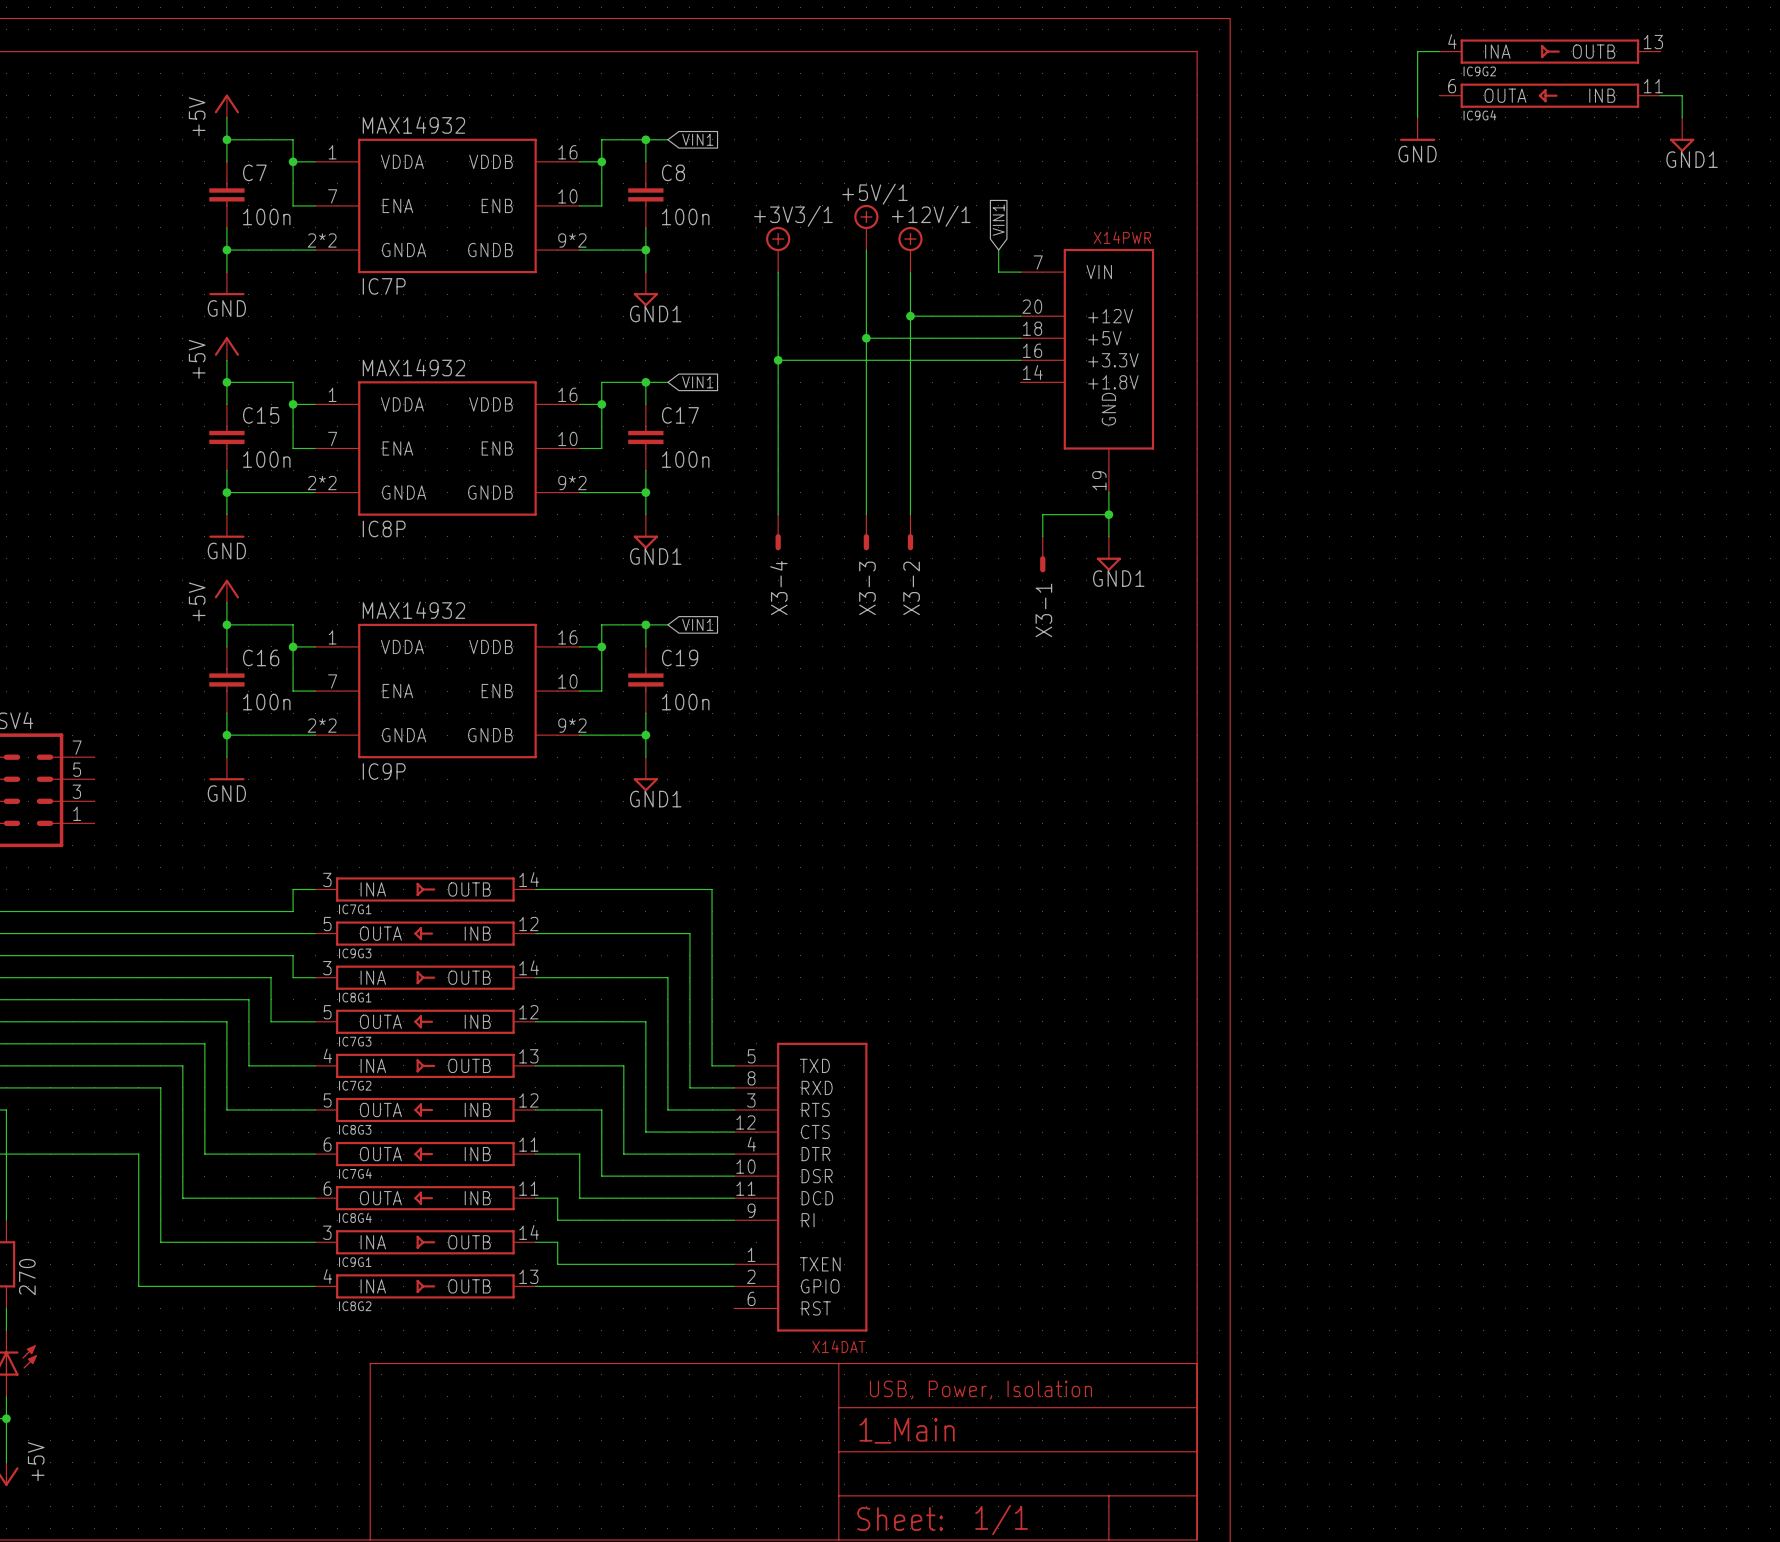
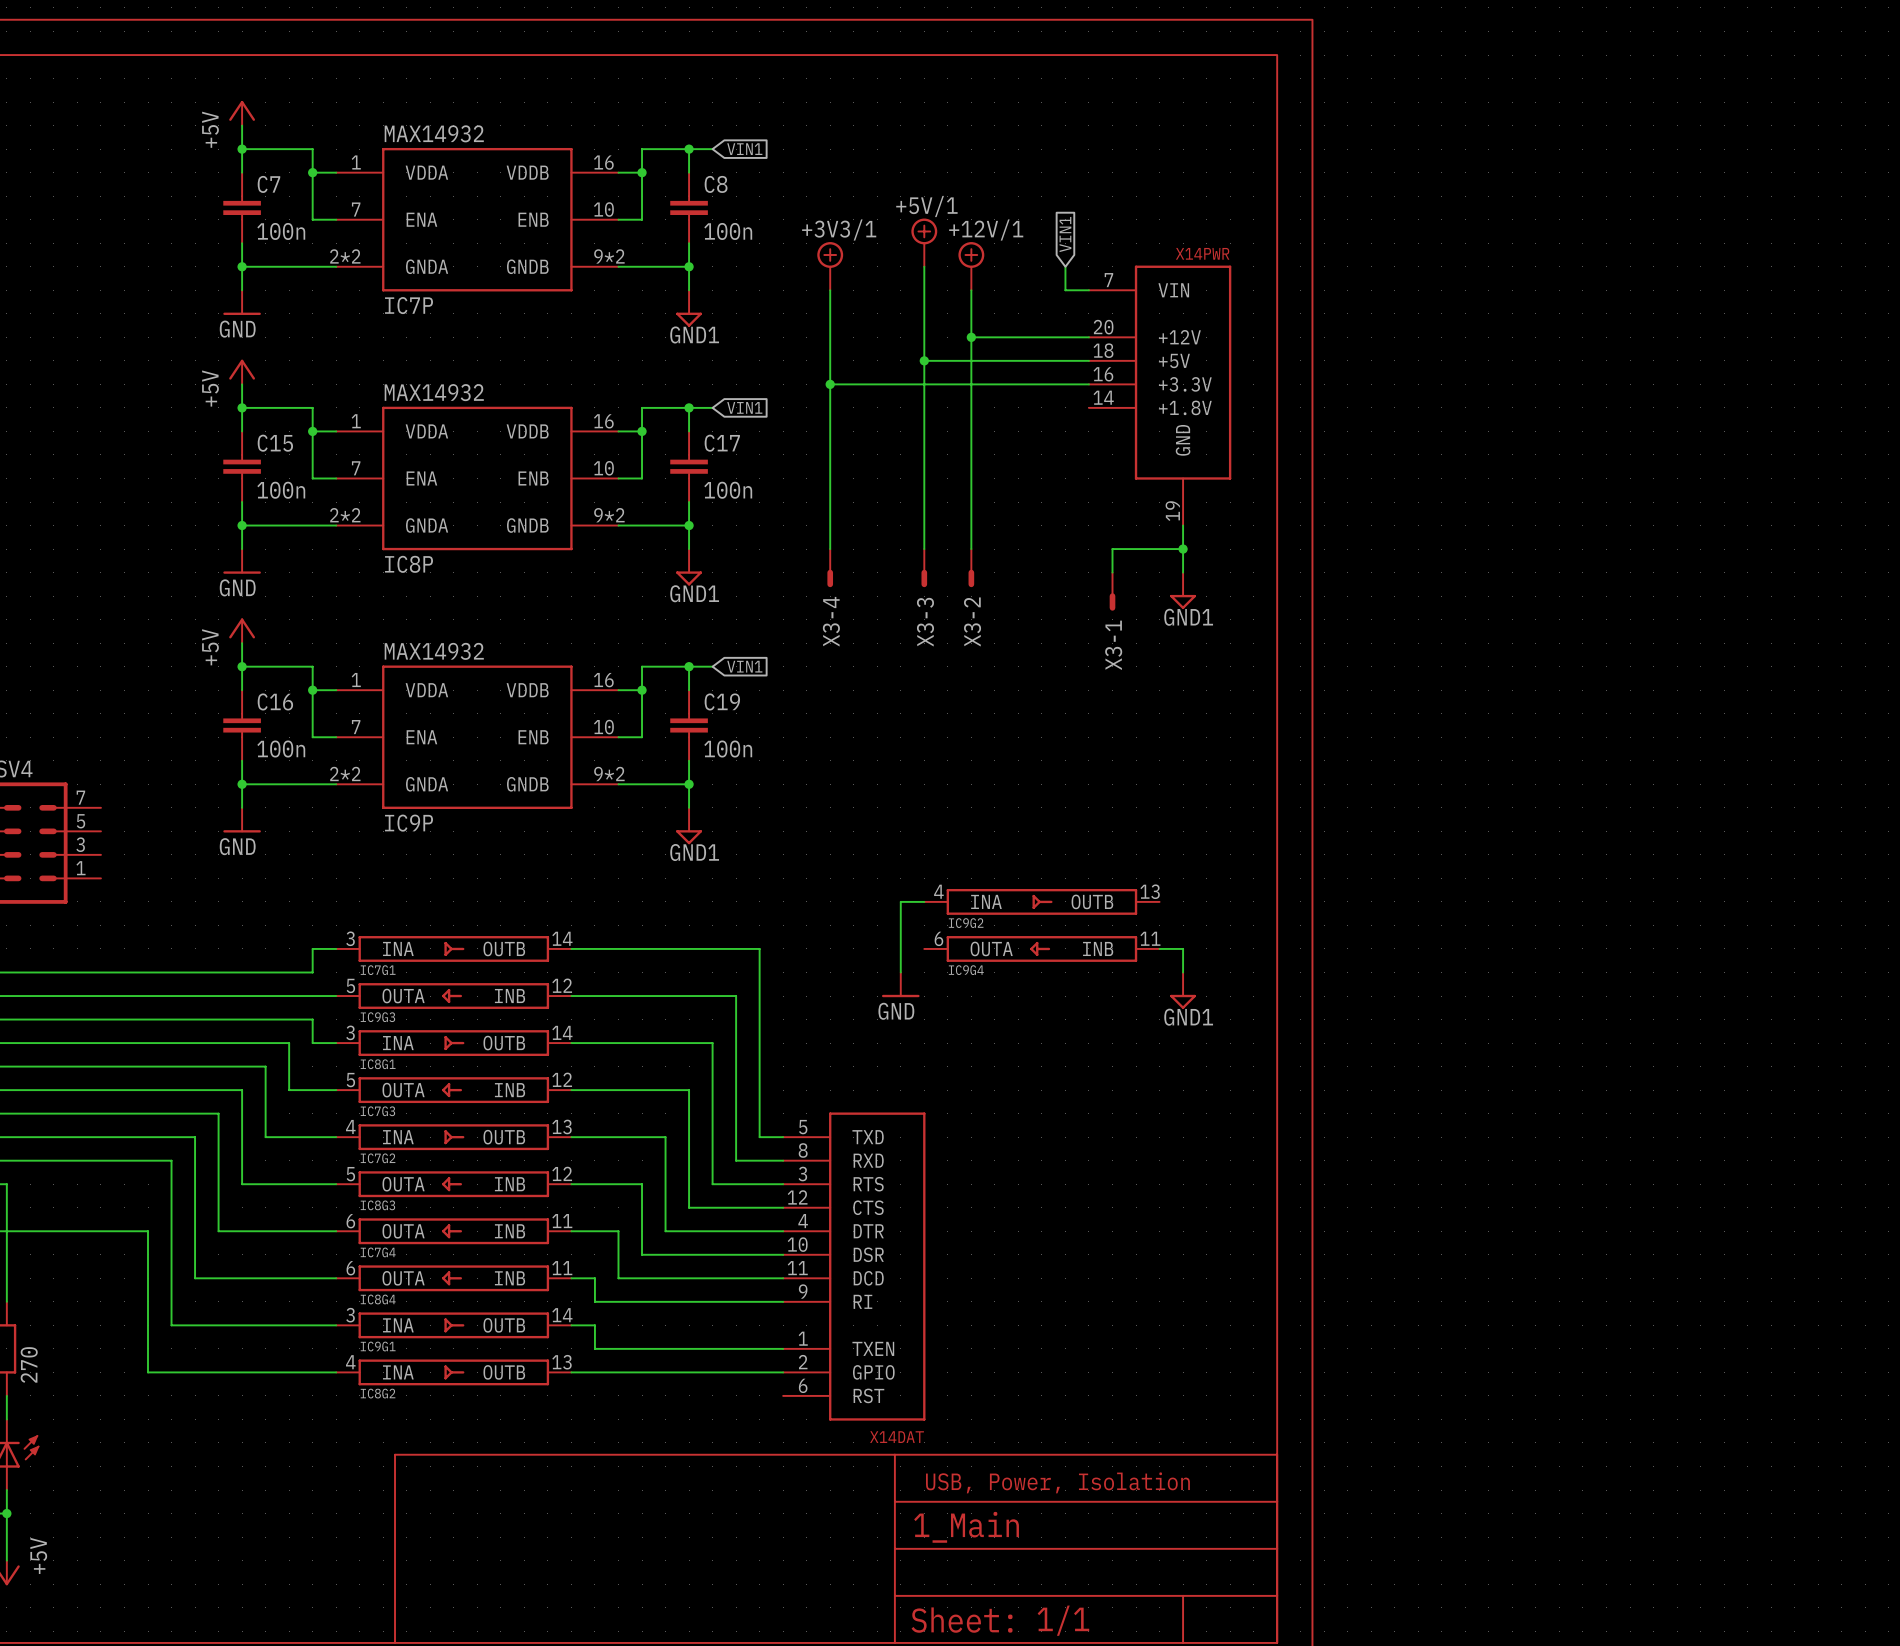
wire: (1439, 51) (1417, 51) (1417, 117) -> none
IC9G2 position: (1549, 51) -> (1041, 901)
IC9G4 position: (1549, 95) -> (1041, 948)
wire: (1660, 95) (1682, 95) (1682, 117) -> none
power symbol: GND (1417, 129) -> none
power symbol: GND1 (1682, 134) -> none
wire: none -> (924, 901) (900, 901) (900, 972)
wire: none -> (1159, 948) (1183, 948) (1183, 972)
power symbol: none -> GND (900, 984)
power symbol: none -> GND1 (1183, 990)

